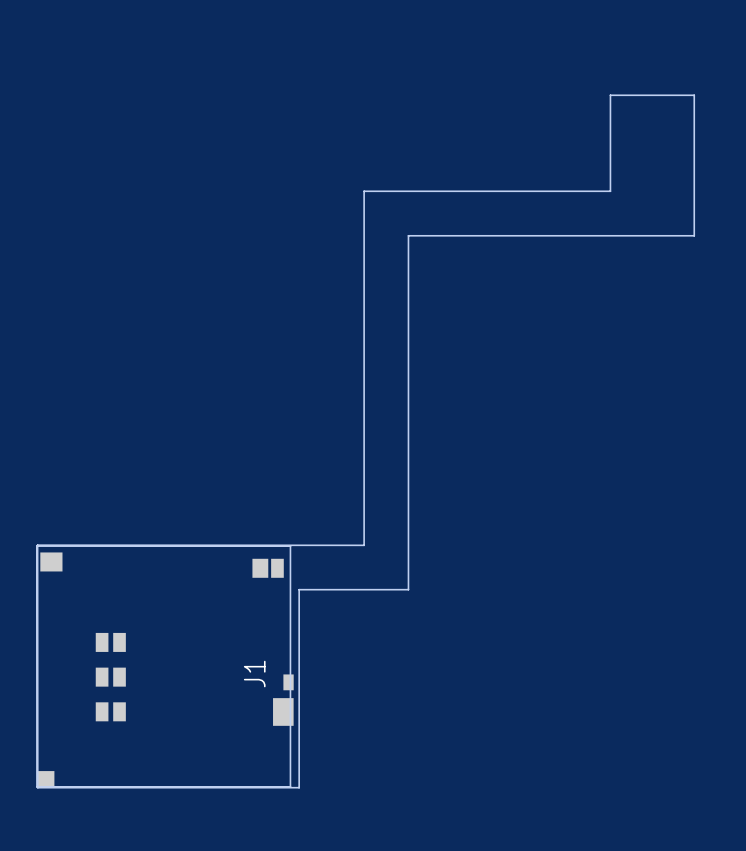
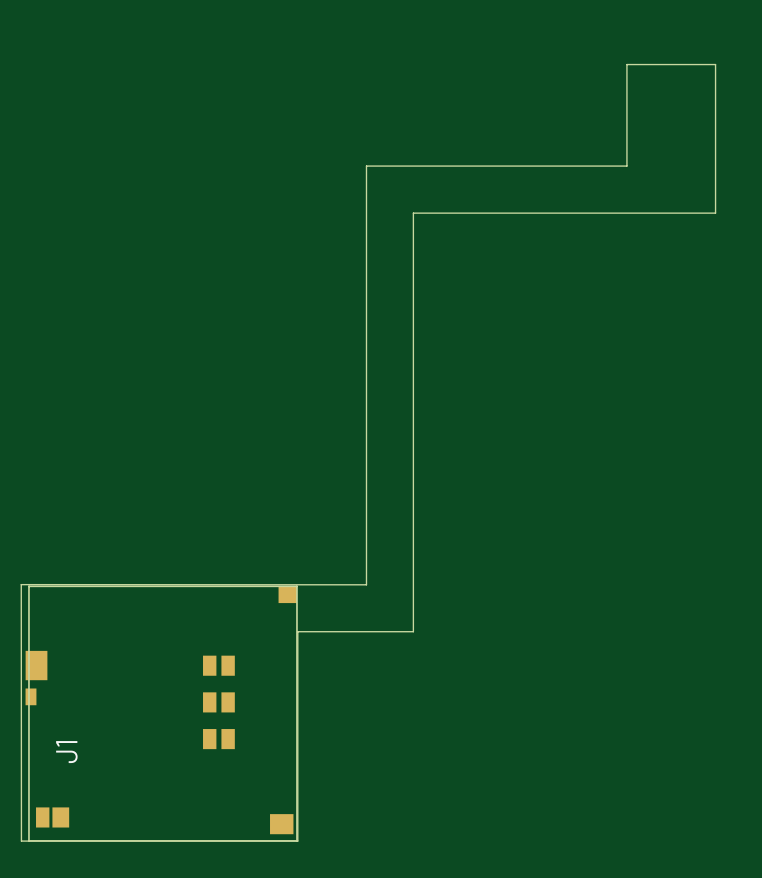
board edge: (610, 95) (694, 95) -> (626, 108) (626, 64) (715, 64) (715, 108)
board edge: (610, 149) (610, 191) (364, 191) -> (626, 166) (366, 166) (366, 210)
board edge: (694, 193) (694, 235) (408, 235) -> (715, 213) (413, 213) (413, 257)
J1 rotation: 0° (164, 666) -> 180° (161, 713)
J1 name position: J1 (254, 674) -> J1 (66, 752)

